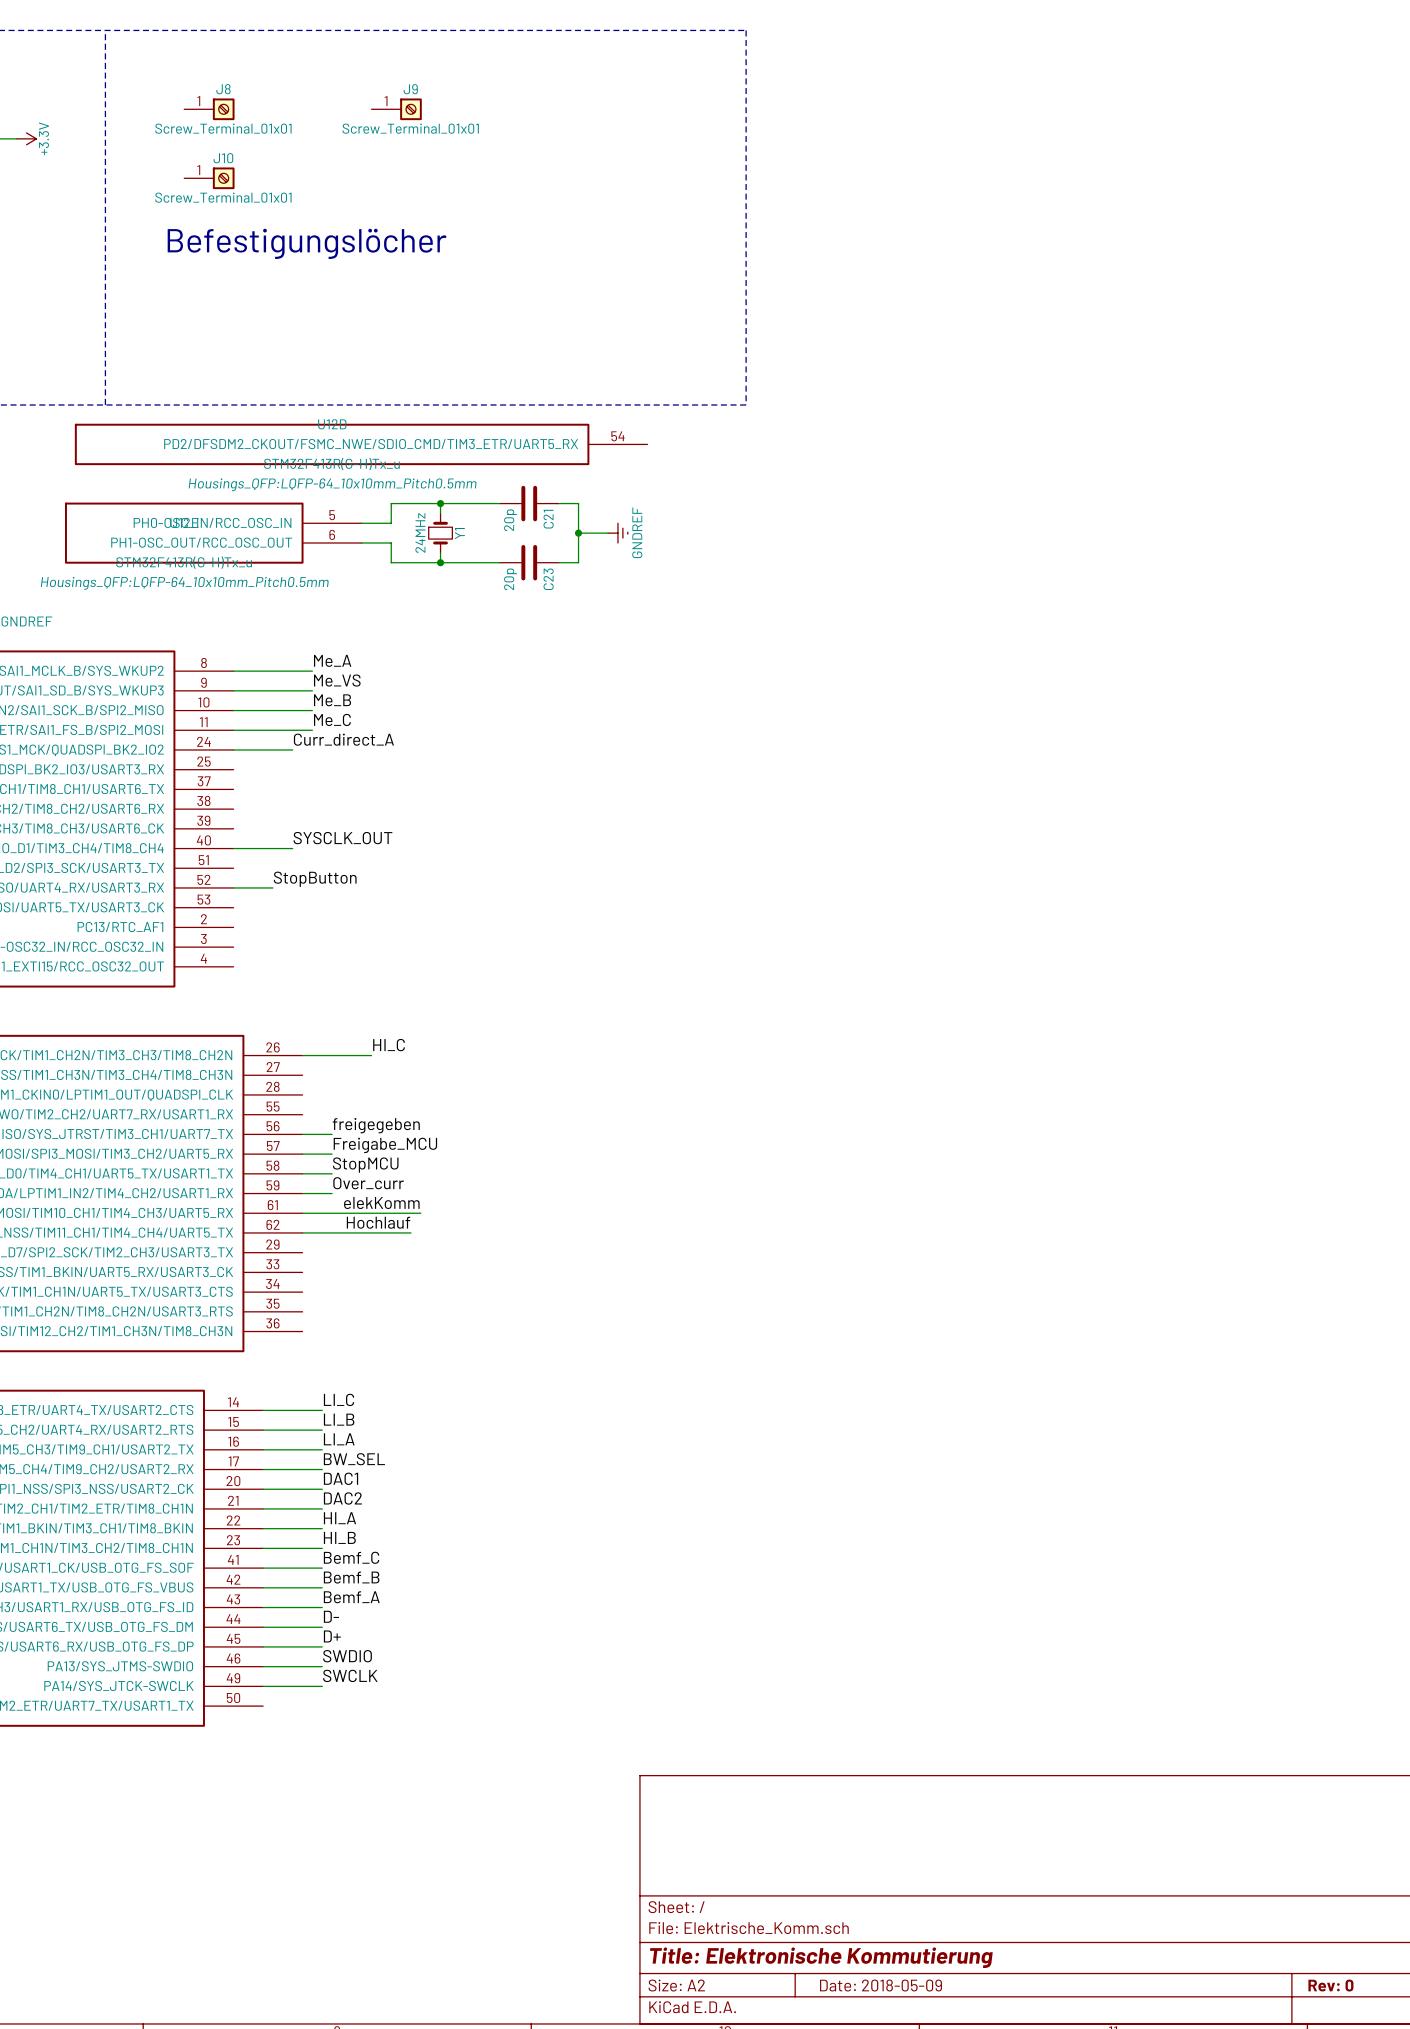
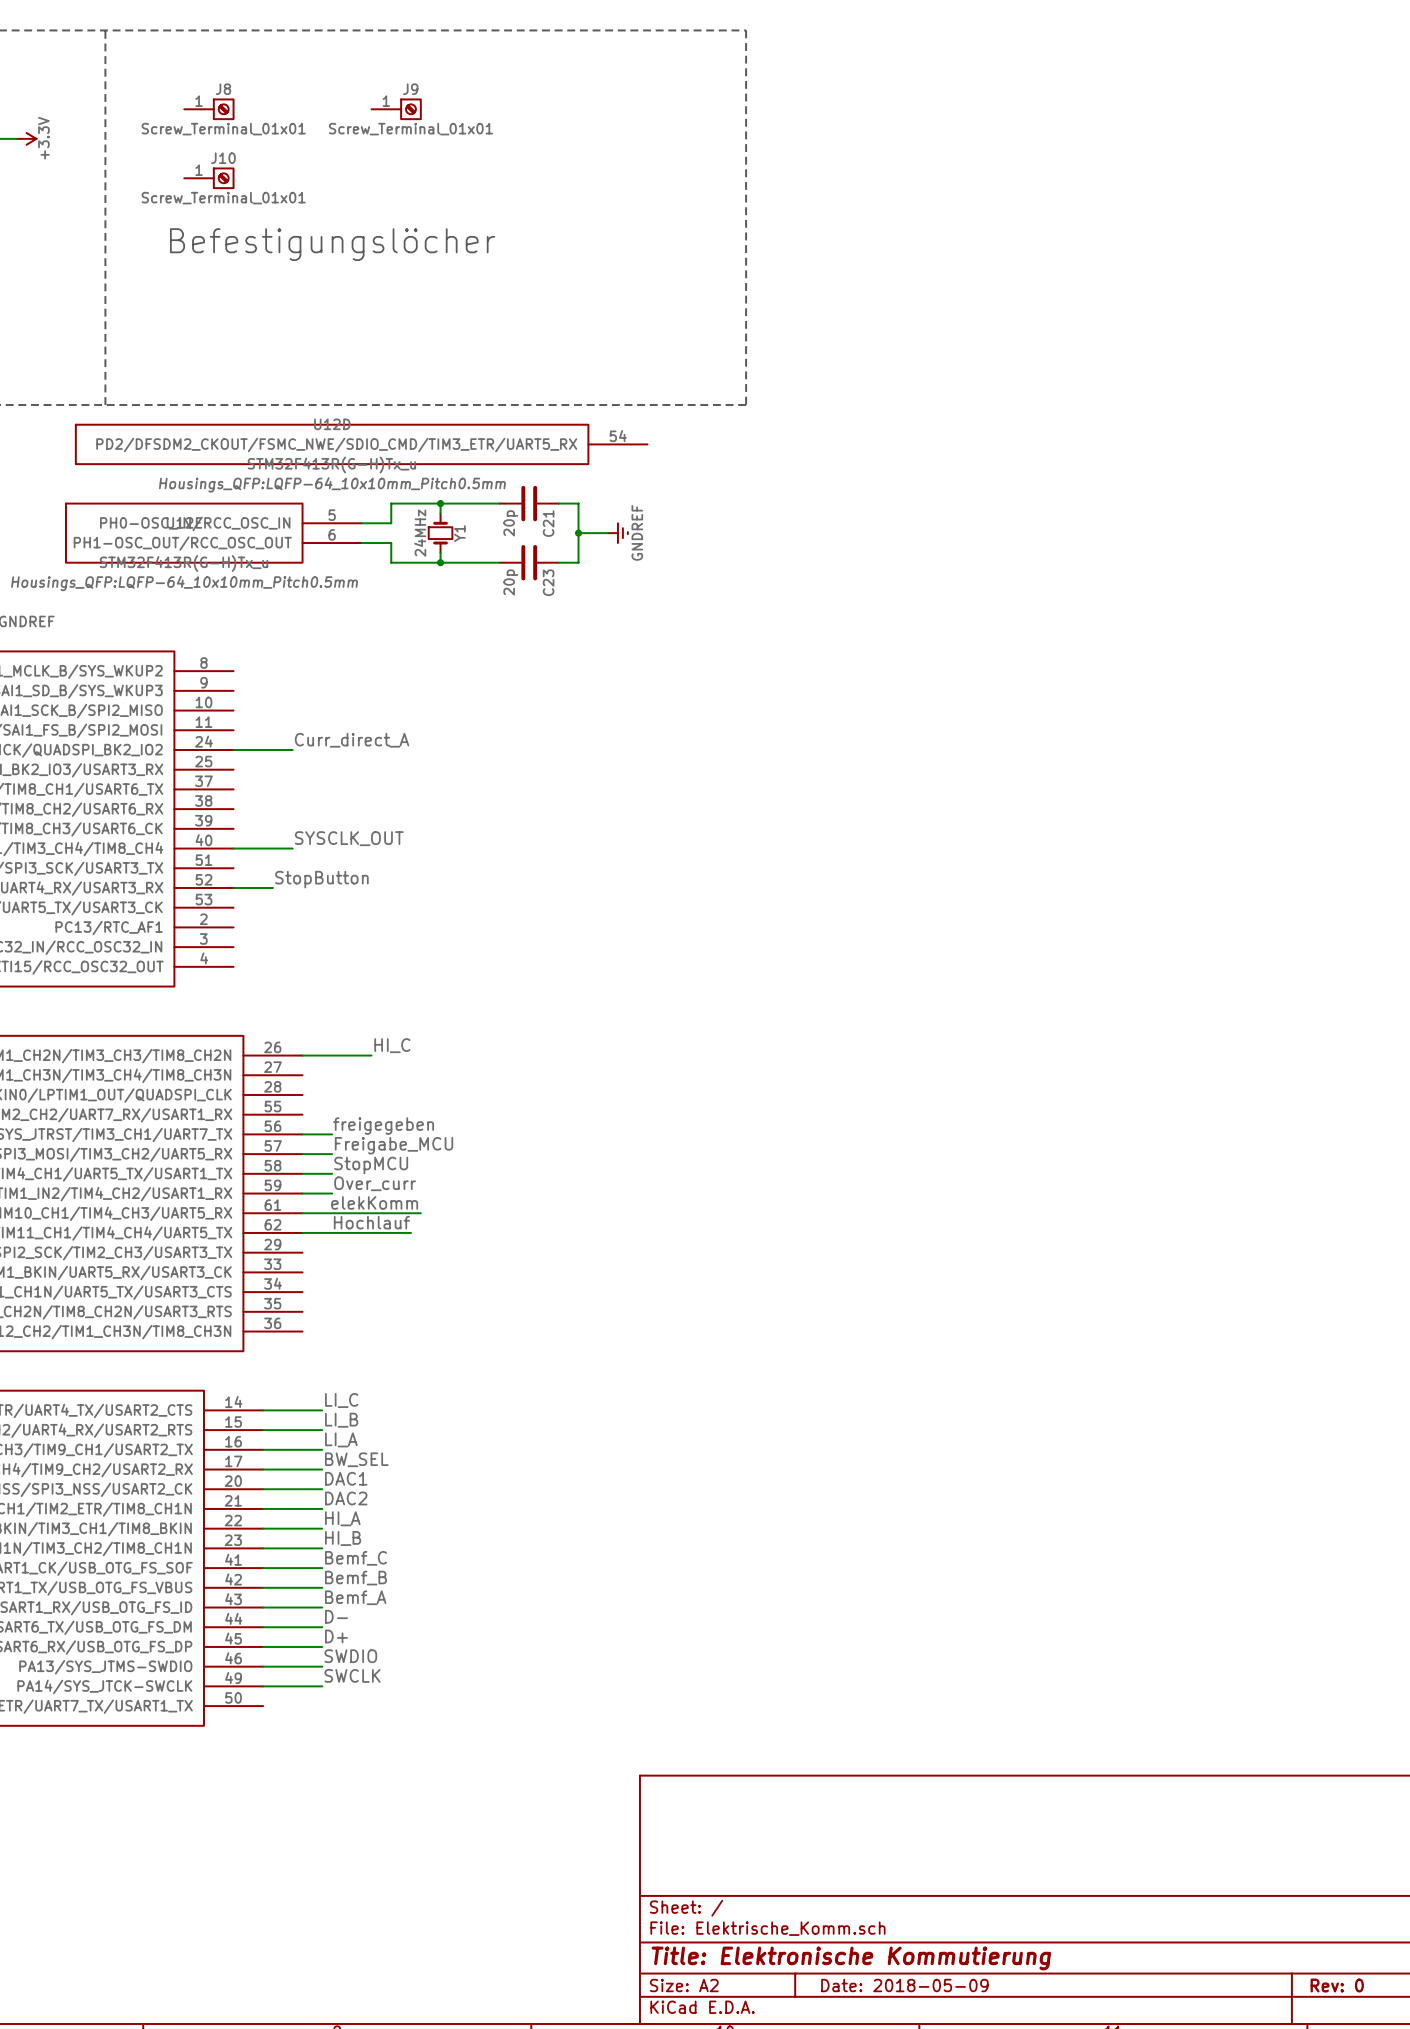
label: Me_A (332, 660) -> none
wire: (233, 671) (312, 671) -> none
label: Me_VS (337, 680) -> none
wire: (233, 690) (312, 690) -> none
label: Me_B (332, 700) -> none
wire: (233, 710) (312, 710) -> none
label: Me_C (332, 719) -> none
wire: (233, 730) (312, 730) -> none

